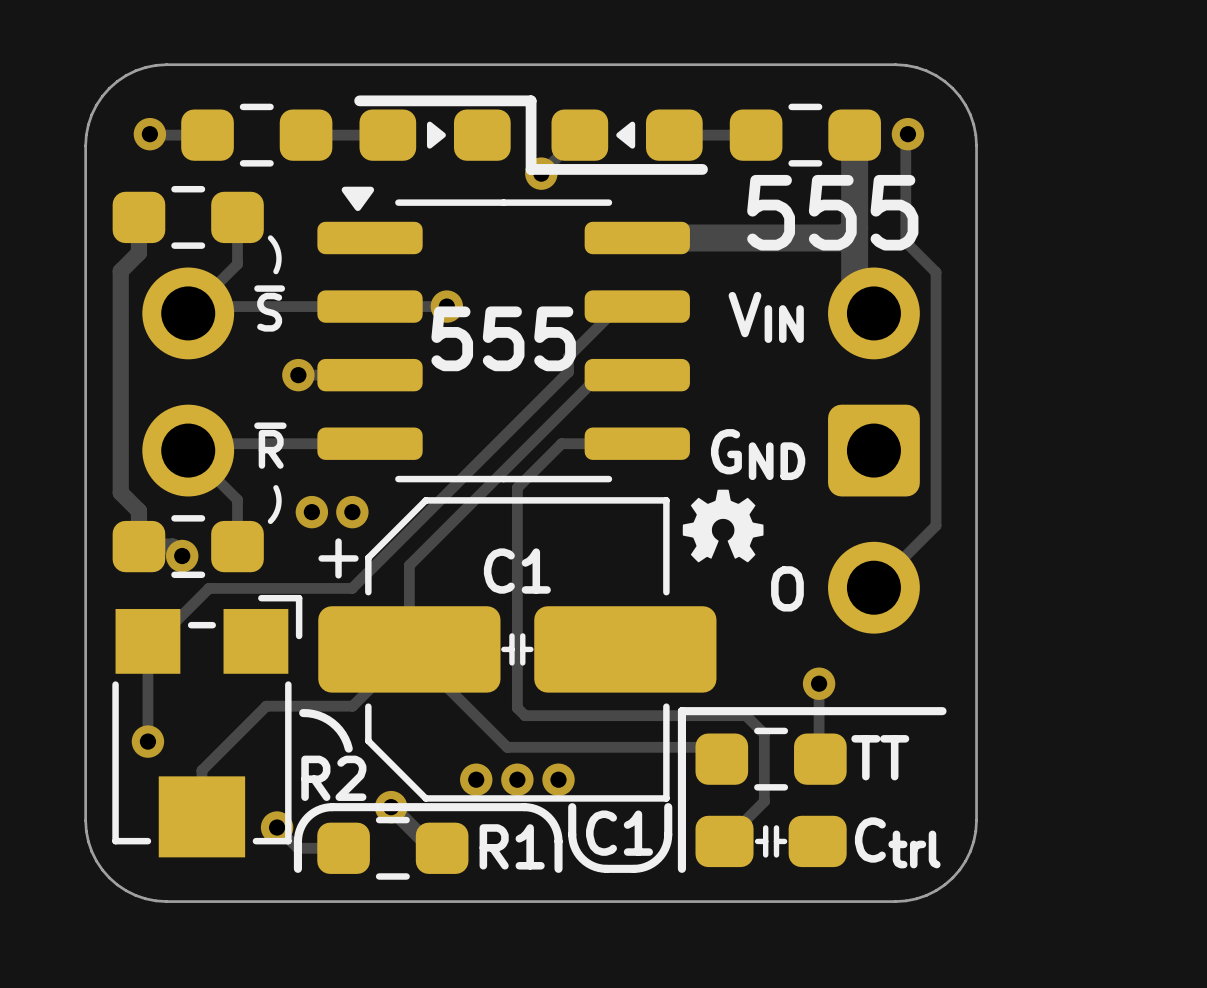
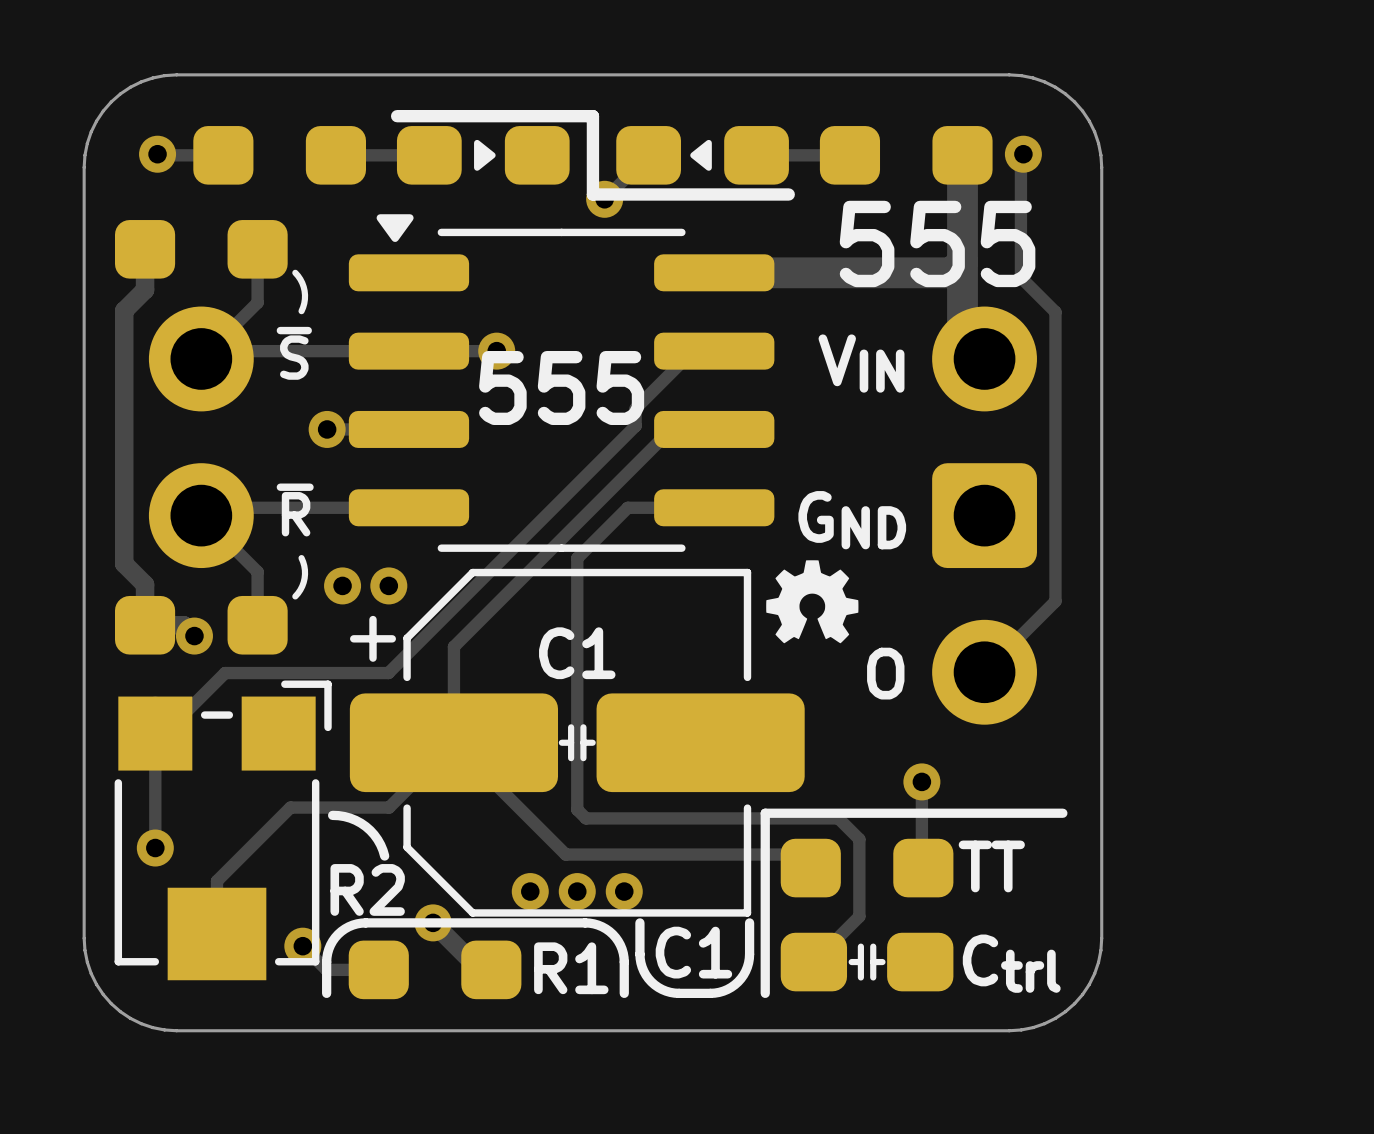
part footprint: [181, 103, 333, 167] -> [193, 126, 366, 185]
part footprint: [729, 103, 881, 167] -> [819, 126, 993, 185]
part footprint: [112, 185, 264, 249] -> [114, 220, 288, 279]
part footprint: [112, 515, 264, 579] -> [114, 595, 288, 655]
part footprint: [695, 727, 847, 791] -> [780, 838, 954, 898]
part footprint: [317, 816, 469, 880] -> [348, 940, 522, 1000]

